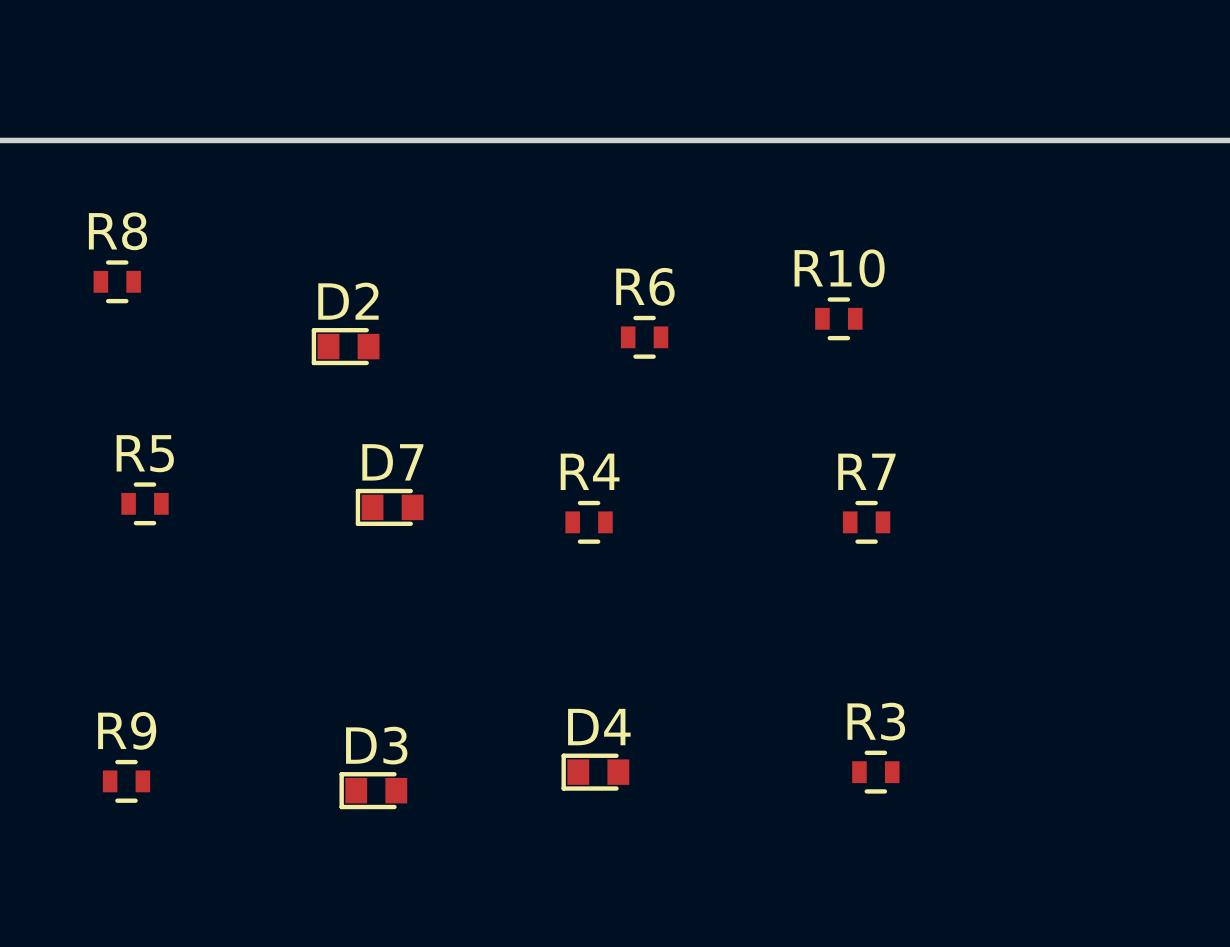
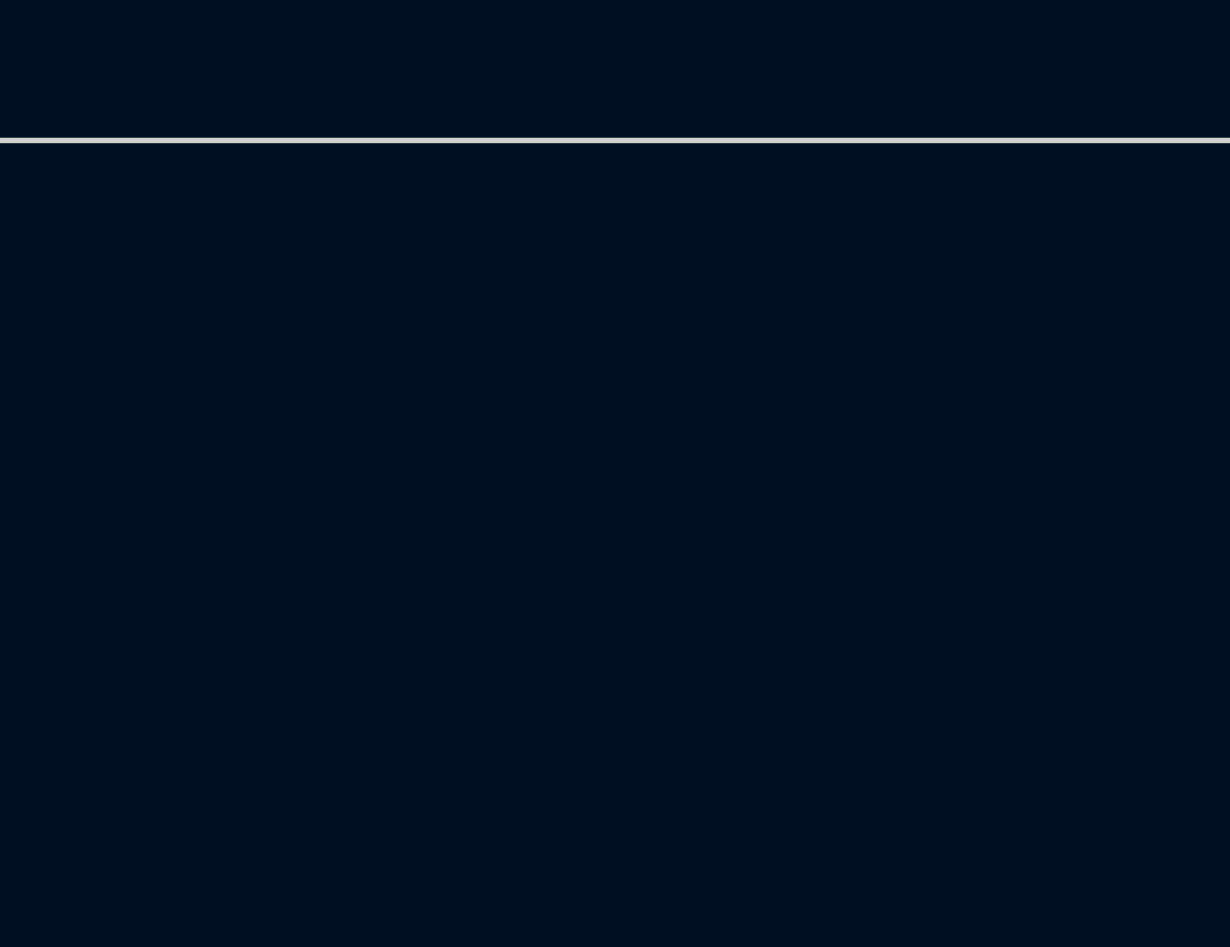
R8: (117, 281) -> none
R10: (838, 318) -> none
R6: (644, 337) -> none
D2: (345, 346) -> none
R5: (144, 503) -> none
D7: (389, 507) -> none
R4: (589, 522) -> none
R7: (866, 522) -> none
D4: (595, 772) -> none
R3: (875, 772) -> none
R9: (126, 781) -> none
D3: (373, 790) -> none

